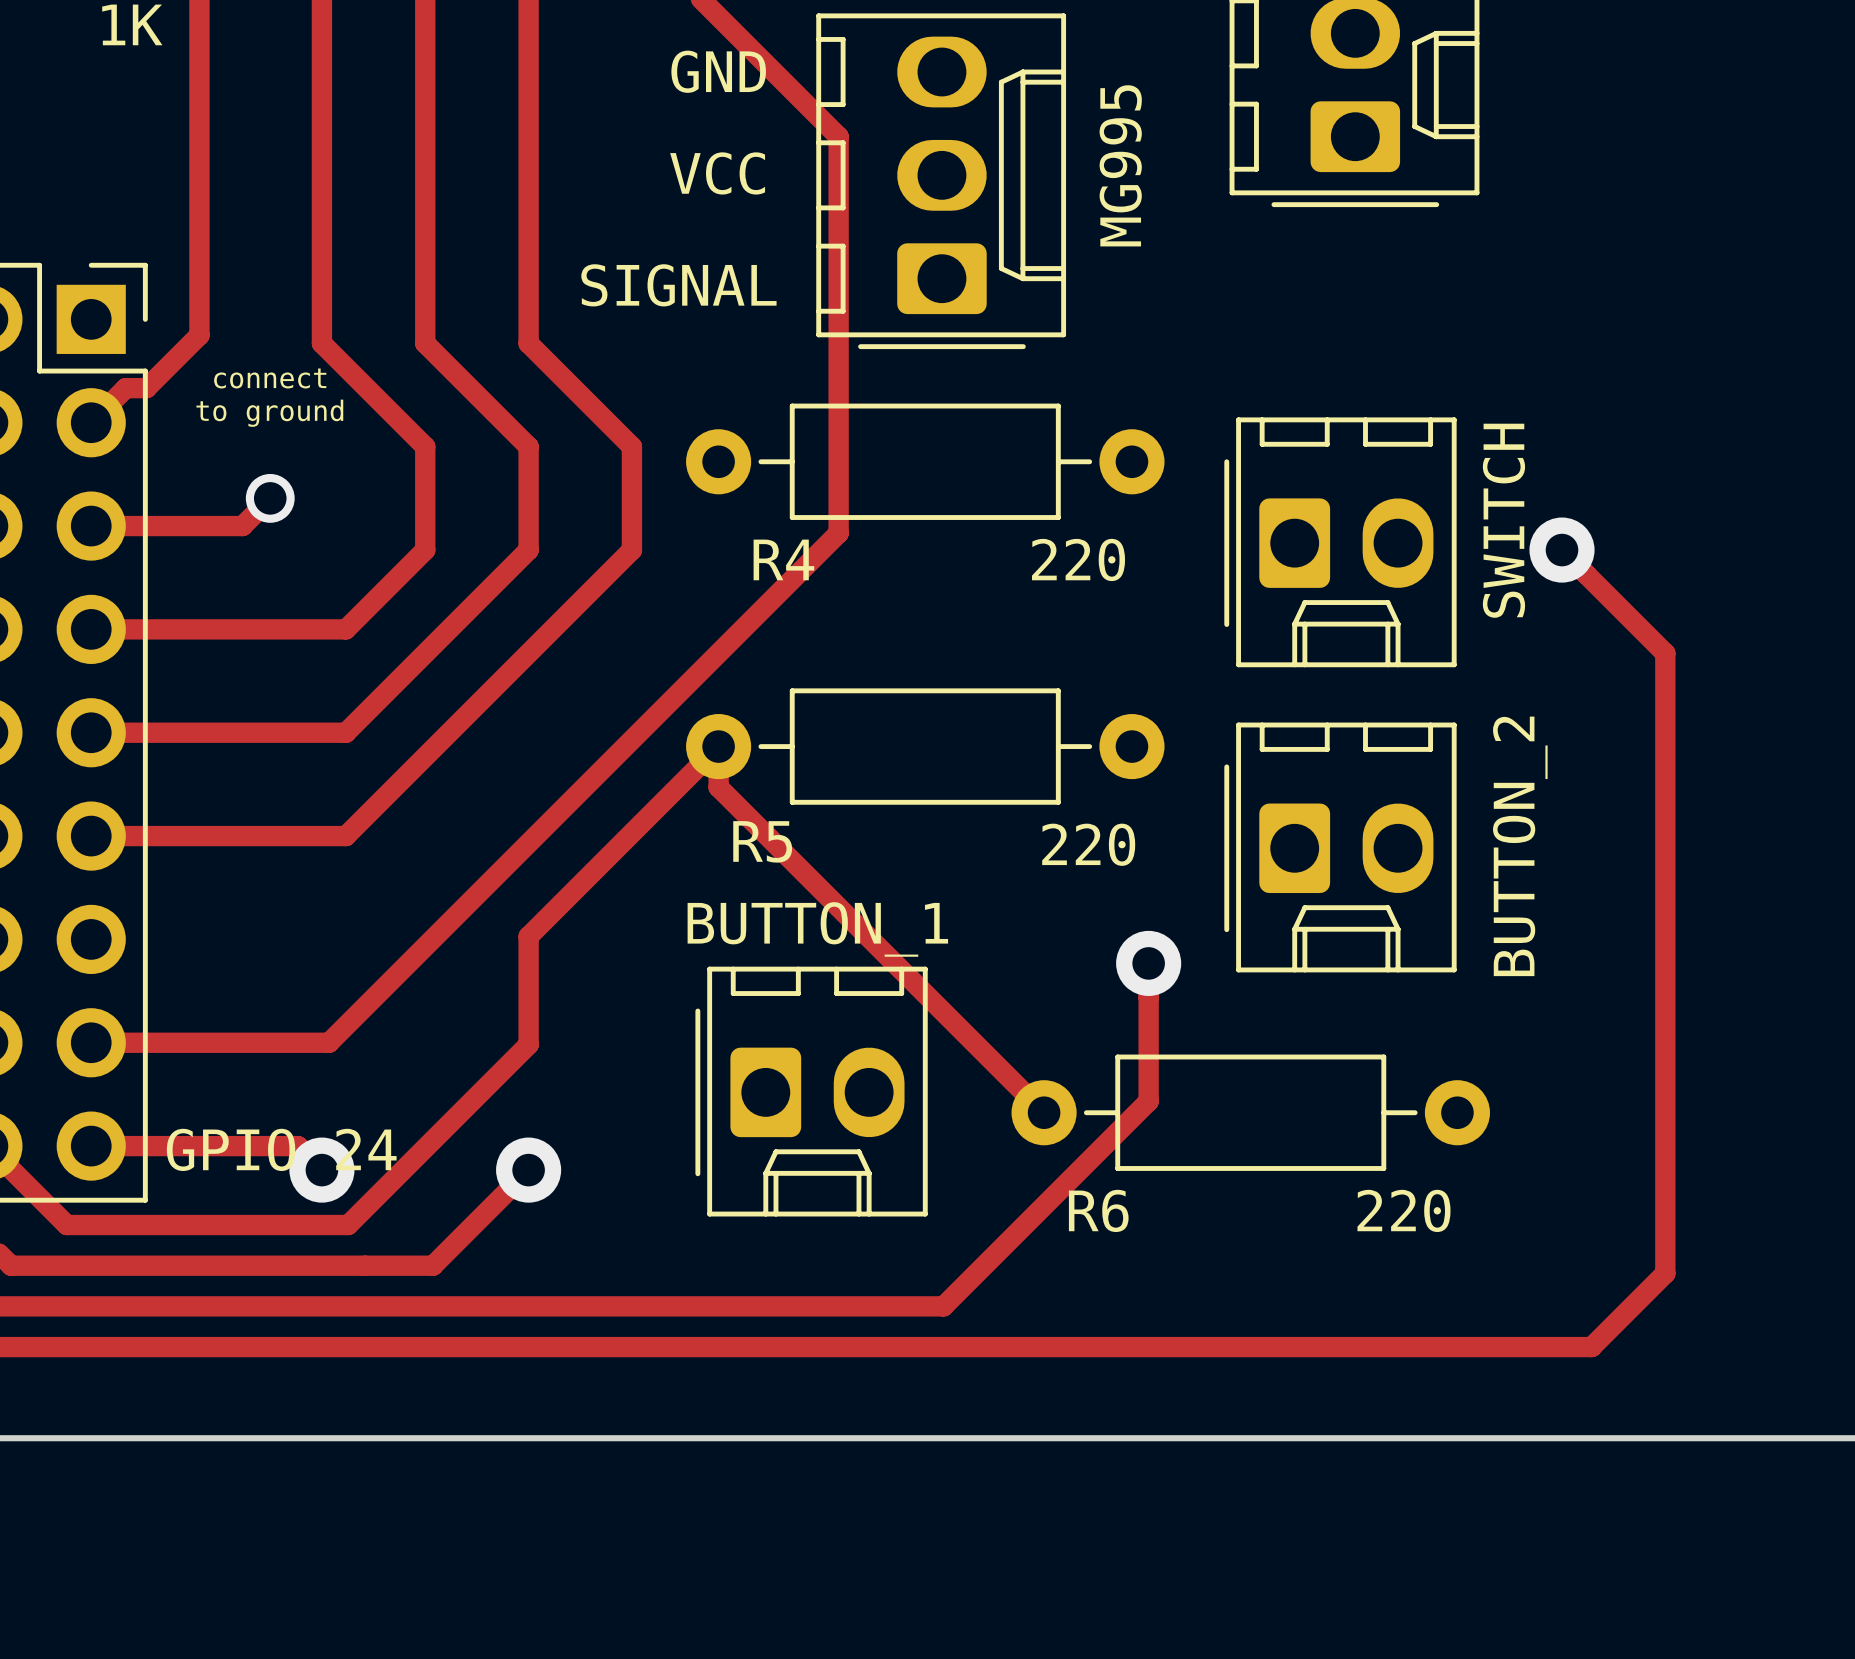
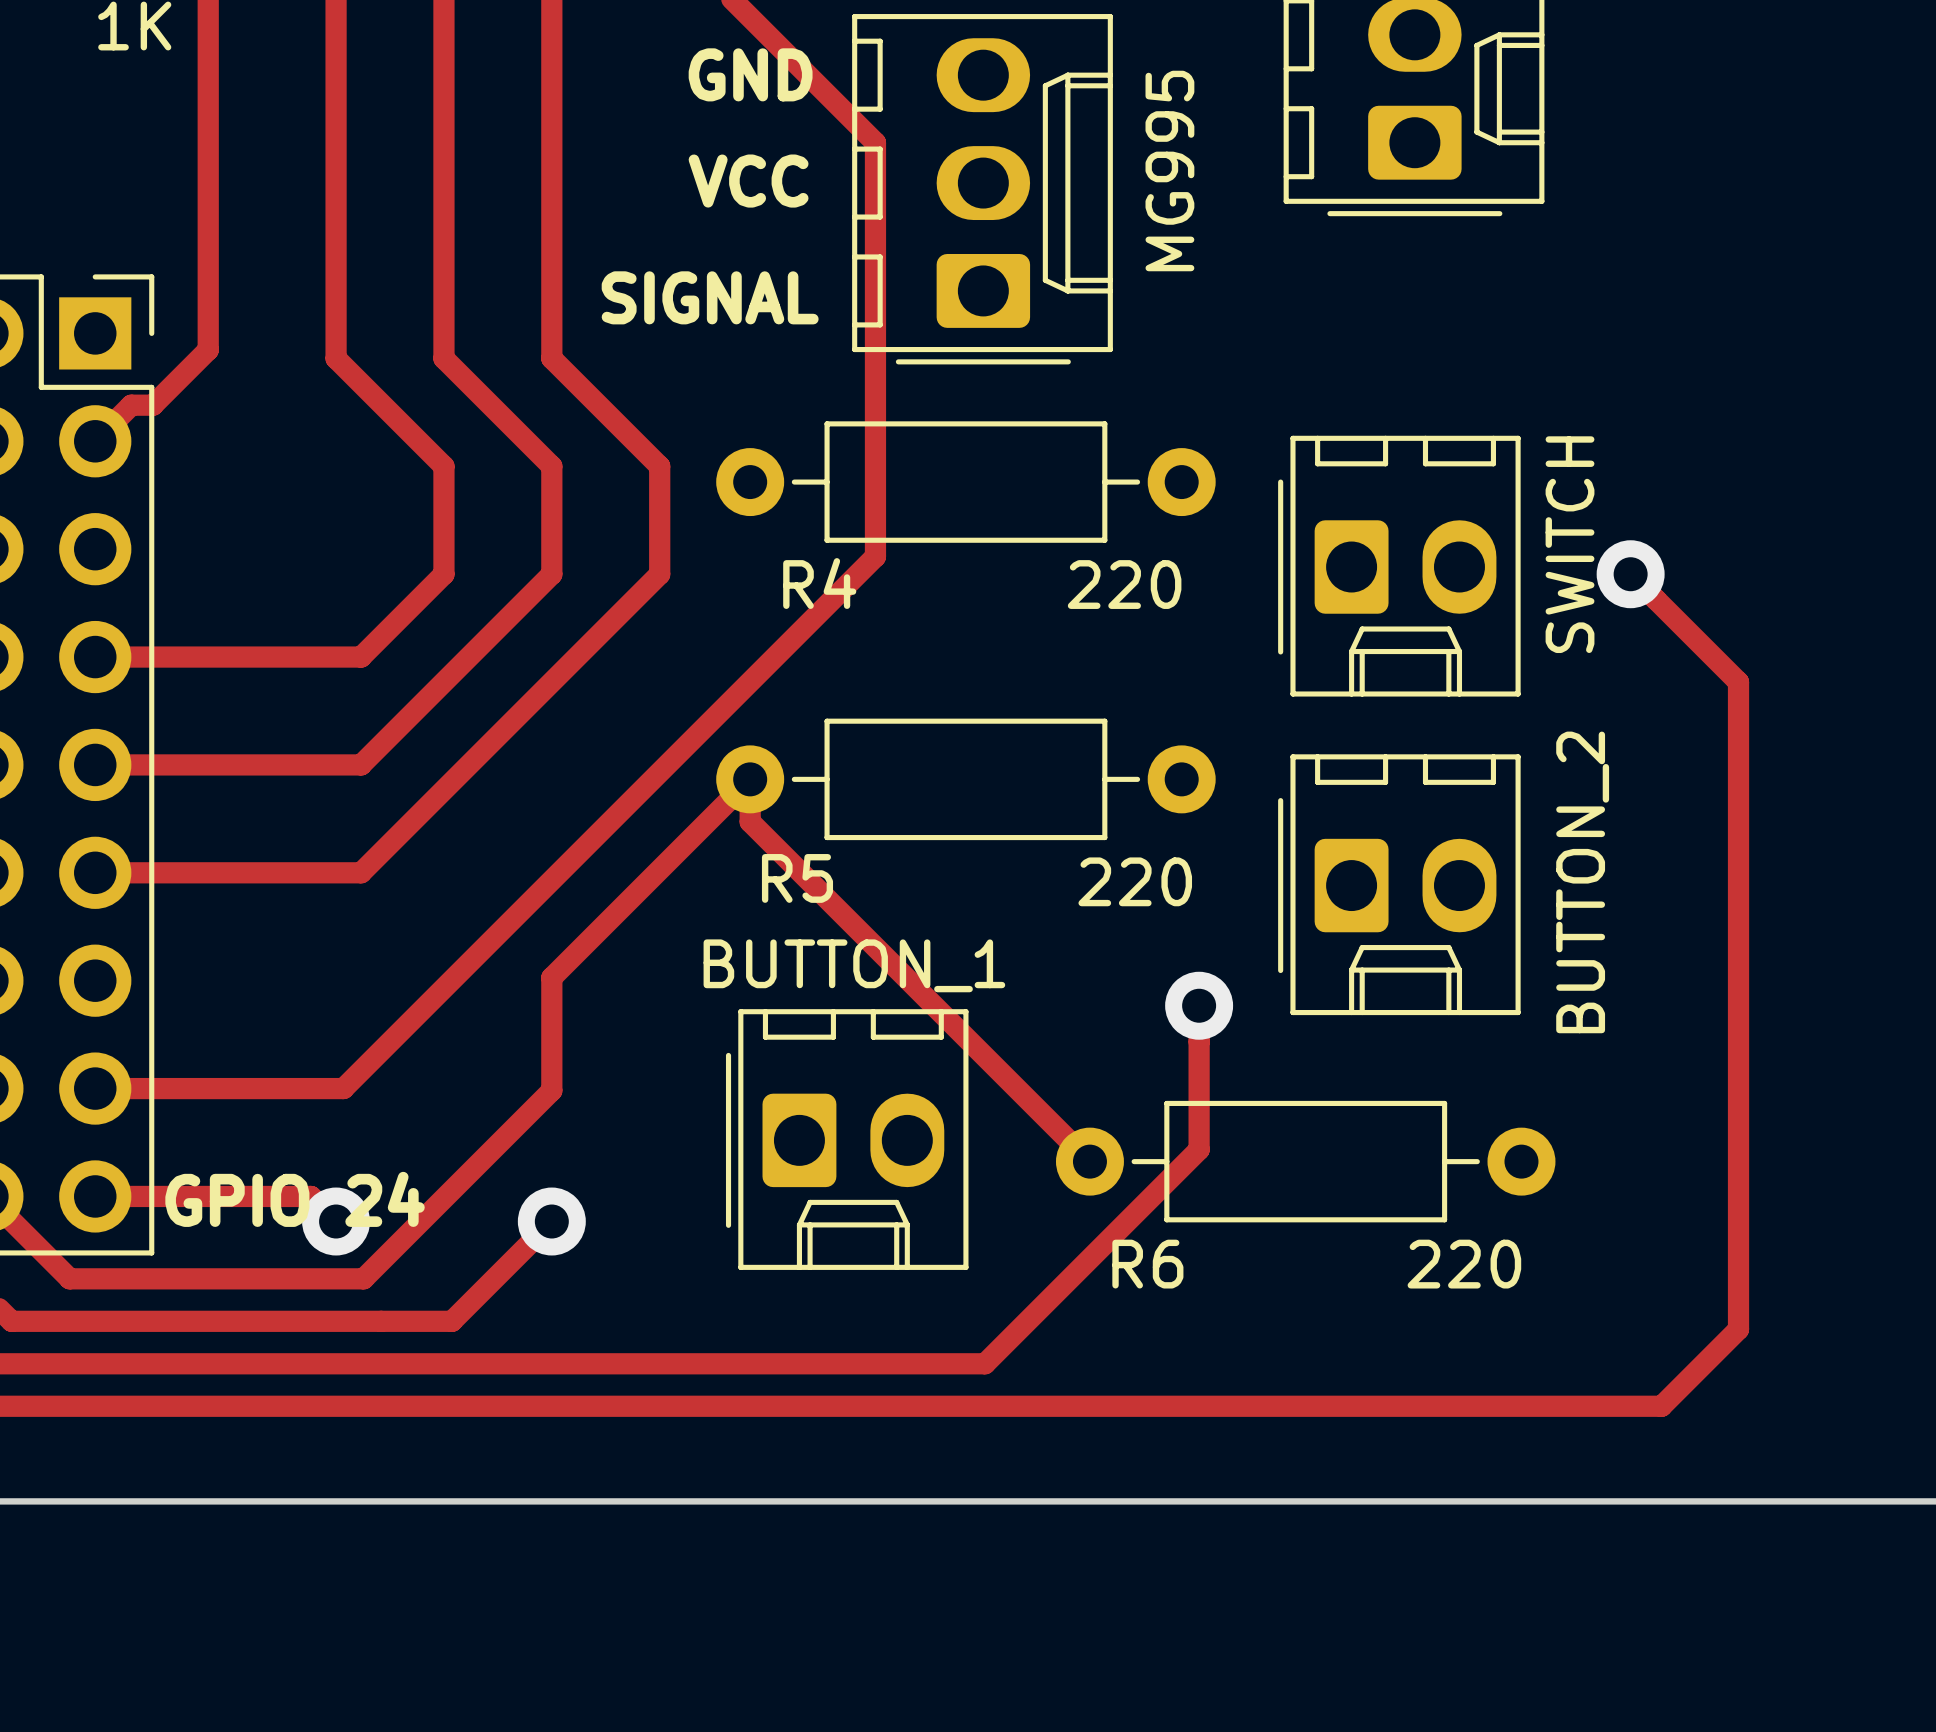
text: connect (270, 378) -> none
text: to ground (269, 413) -> none
track: (270, 498) (242, 526) (91, 526) -> none
via: (270, 498) -> none

